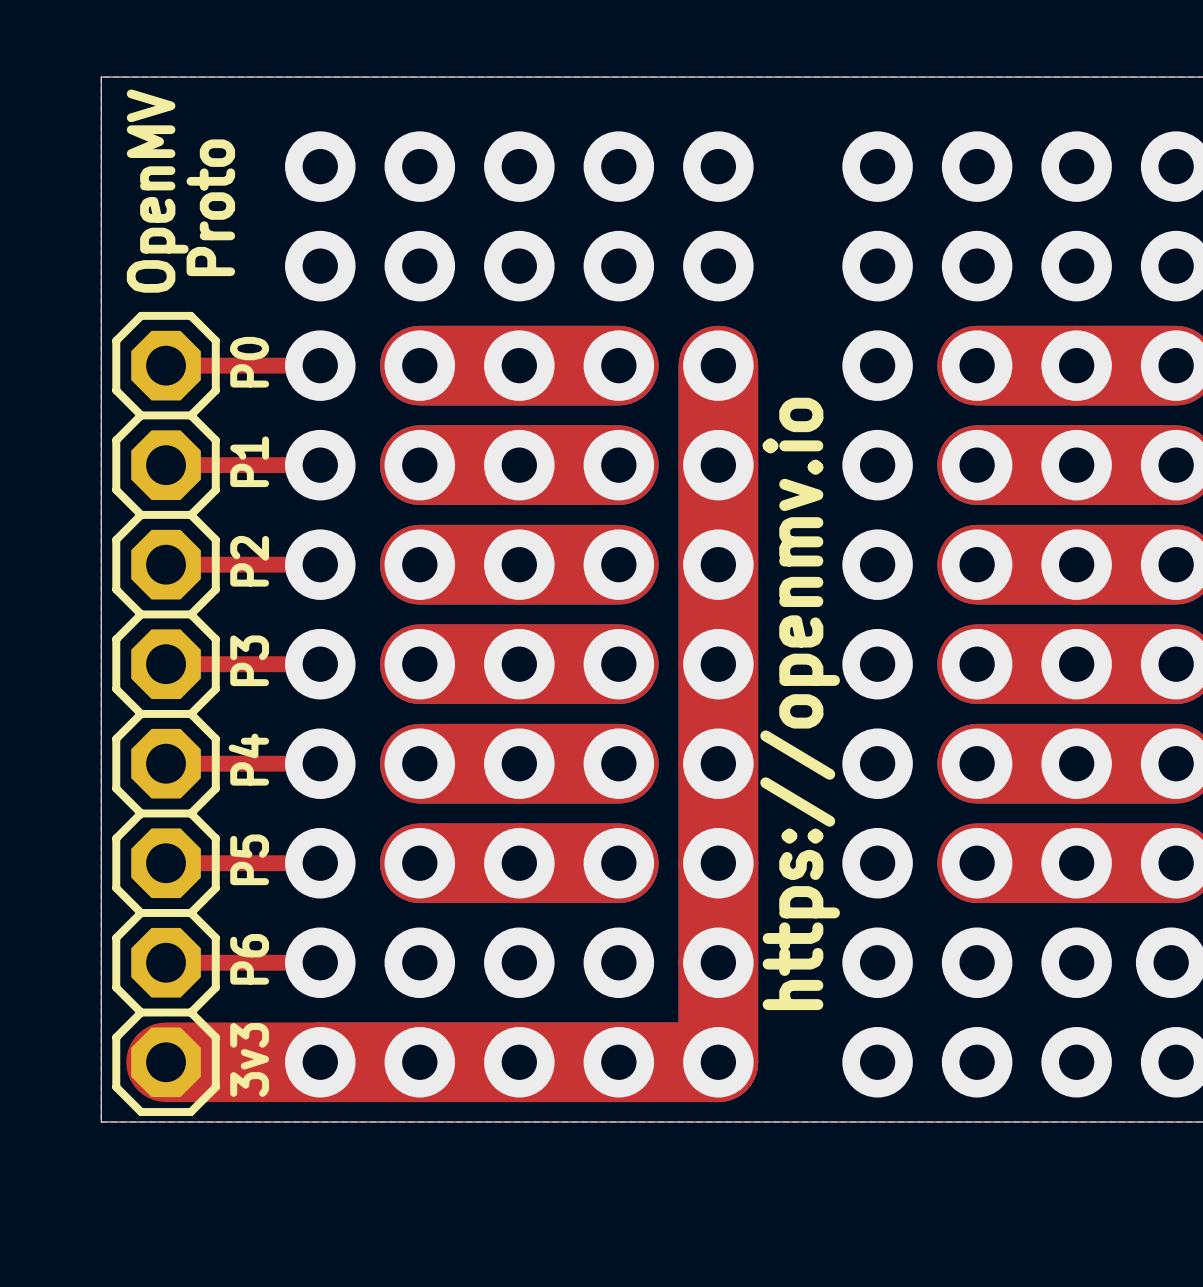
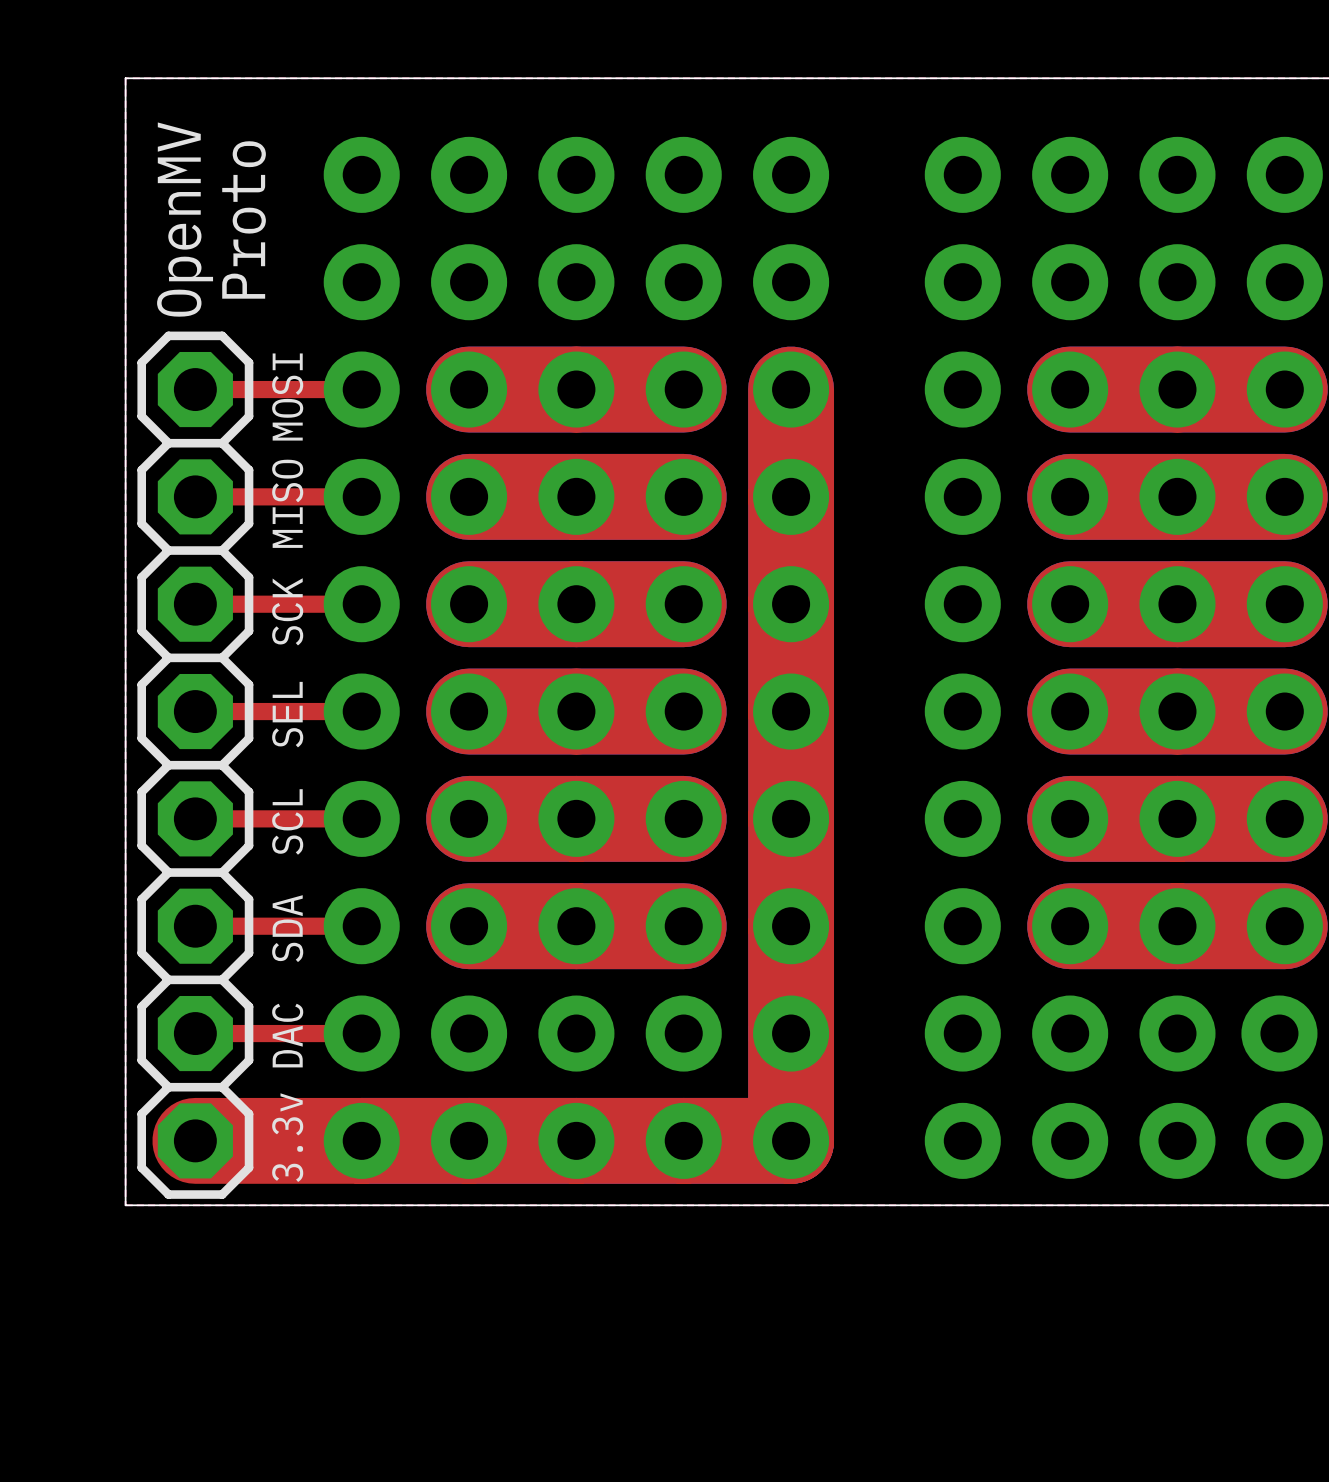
text: P0 (249, 362) -> MOSI (287, 397)
text: P1 (249, 461) -> MISO (287, 503)
text: P2 (249, 561) -> SCK (287, 611)
text: P3 (249, 660) -> SEL (287, 714)
text: https://openmv.io (800, 703) -> none
text: P4 (248, 759) -> SCL (287, 821)
text: P5 (249, 859) -> SDA (287, 928)
text: P6 (249, 959) -> DAC (287, 1035)
text: 3v3 (249, 1059) -> 3.3v (287, 1137)

